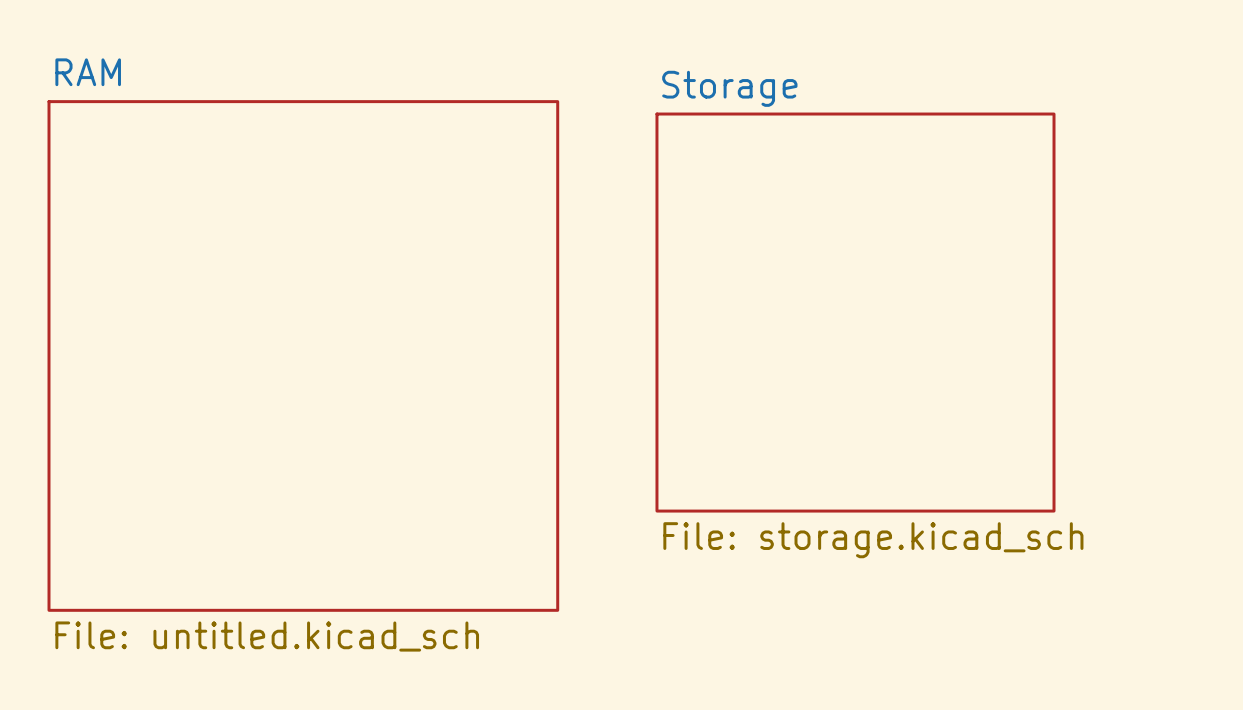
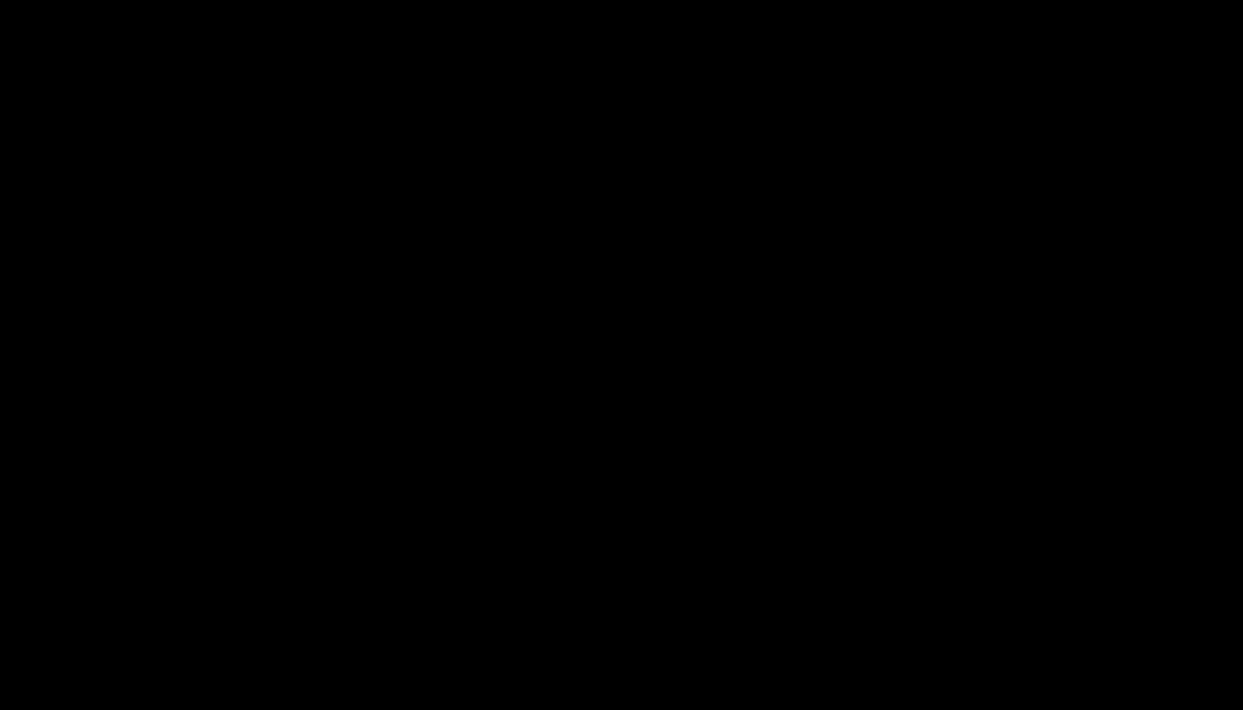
sheet Storage: File: storage.kicad_sch (855, 312) -> none
sheet RAM: File: untitled.kicad_sch (303, 355) -> none

